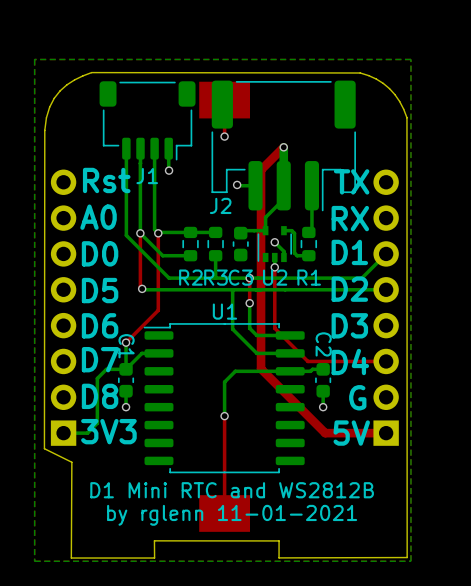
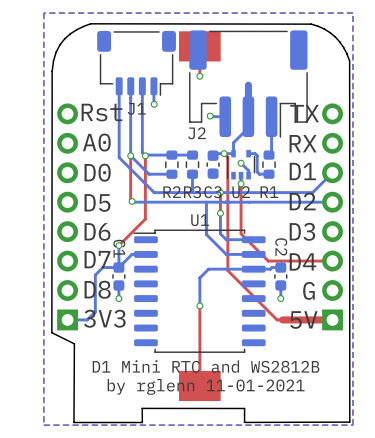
top track: (283, 147) (261, 170) (261, 368) (325, 433) -> (224, 153) (227, 157) (227, 270) (277, 319) (282, 319)
via: (283, 147) -> none
via: none -> (224, 153)

